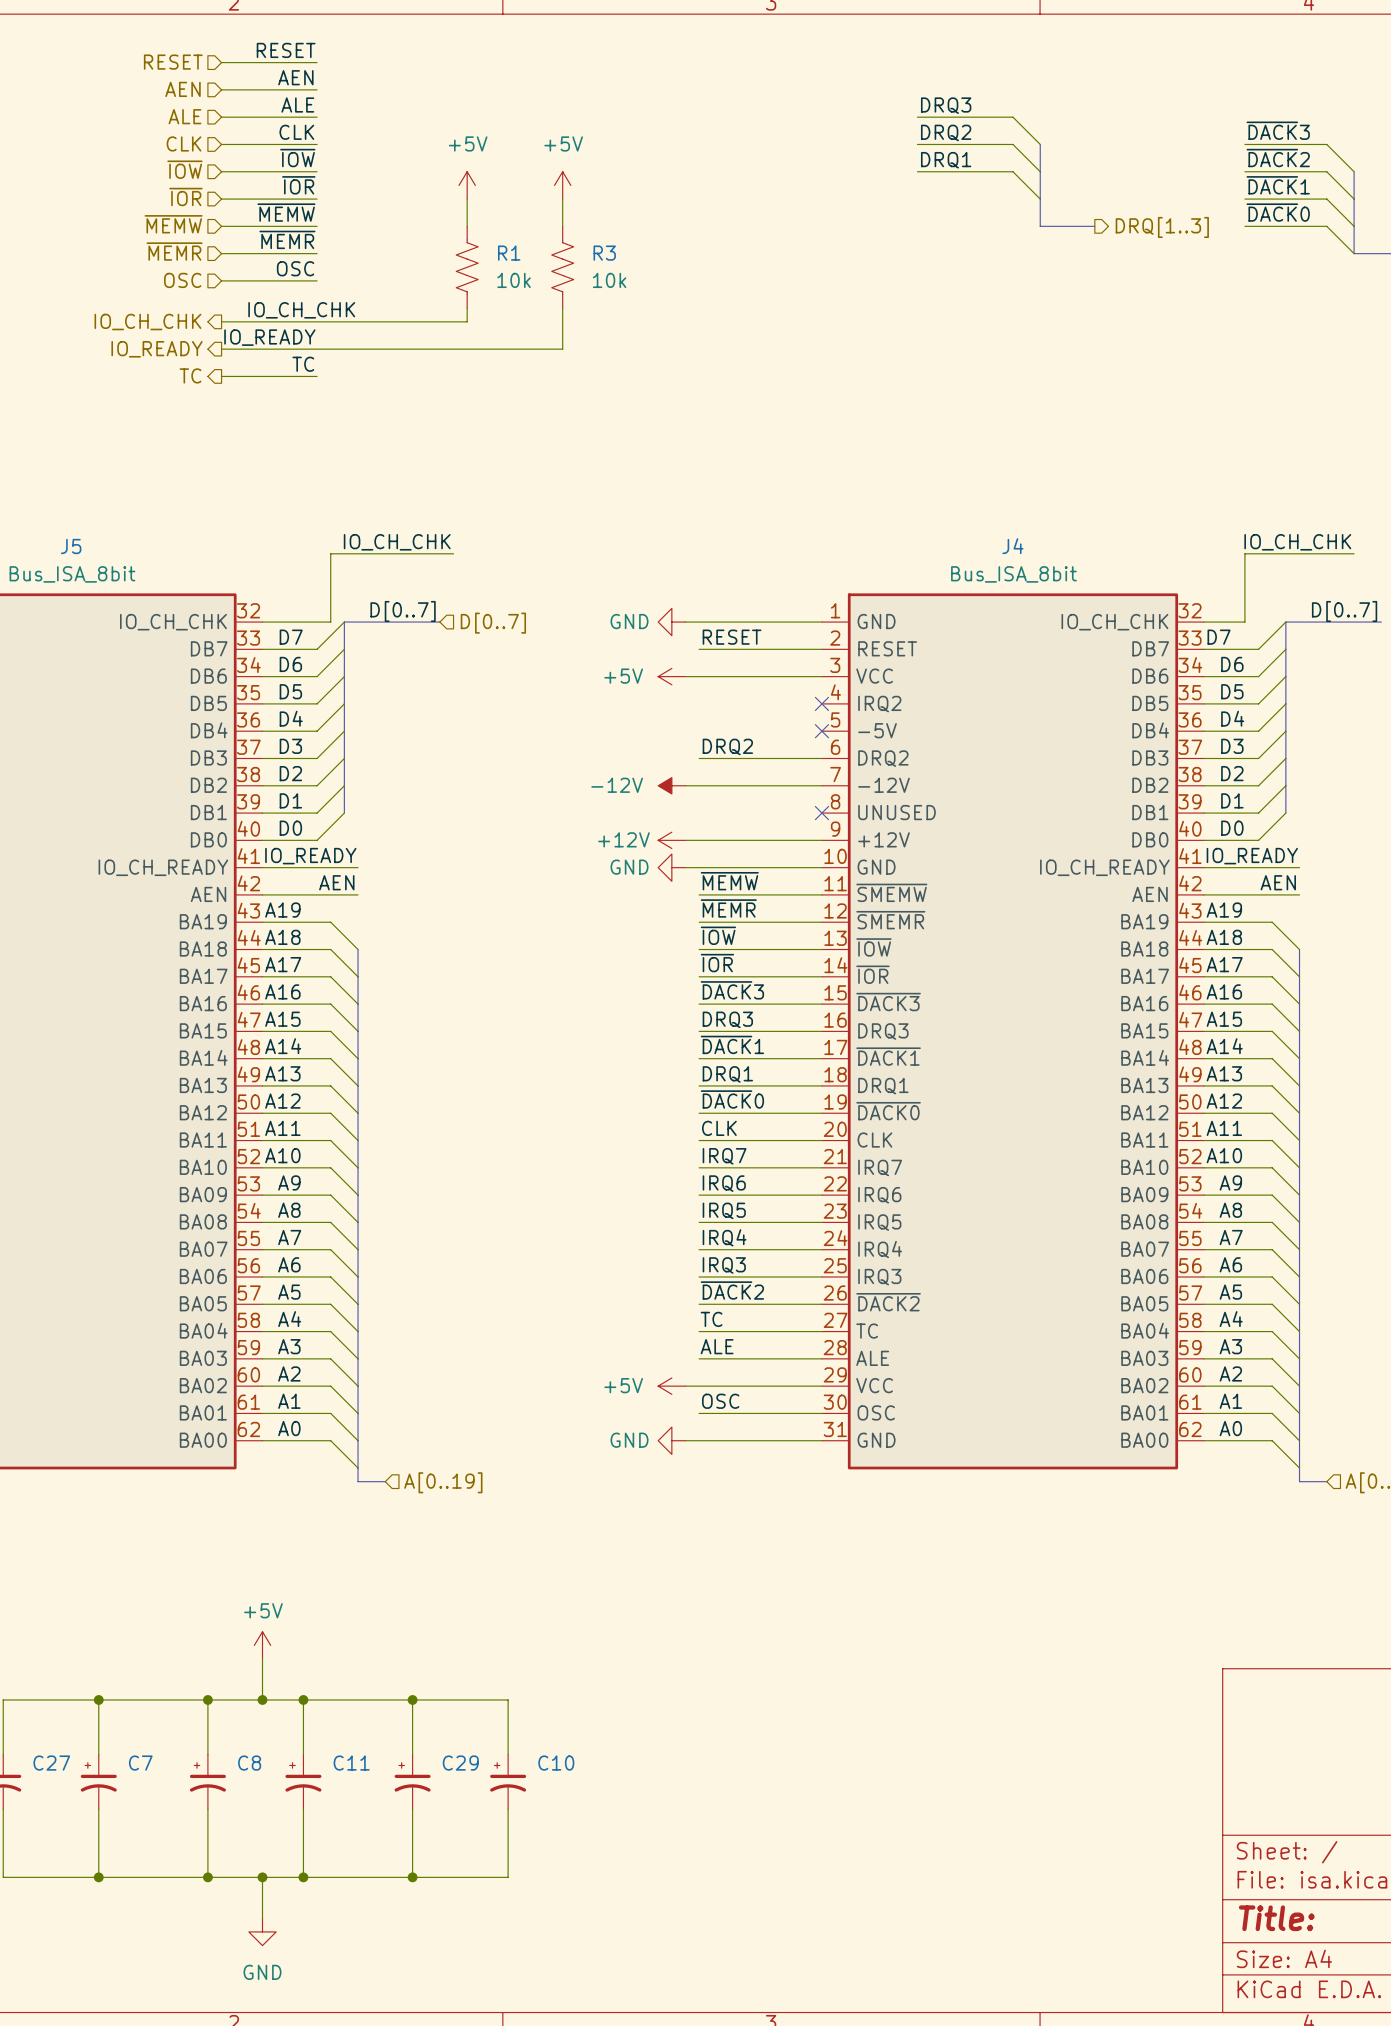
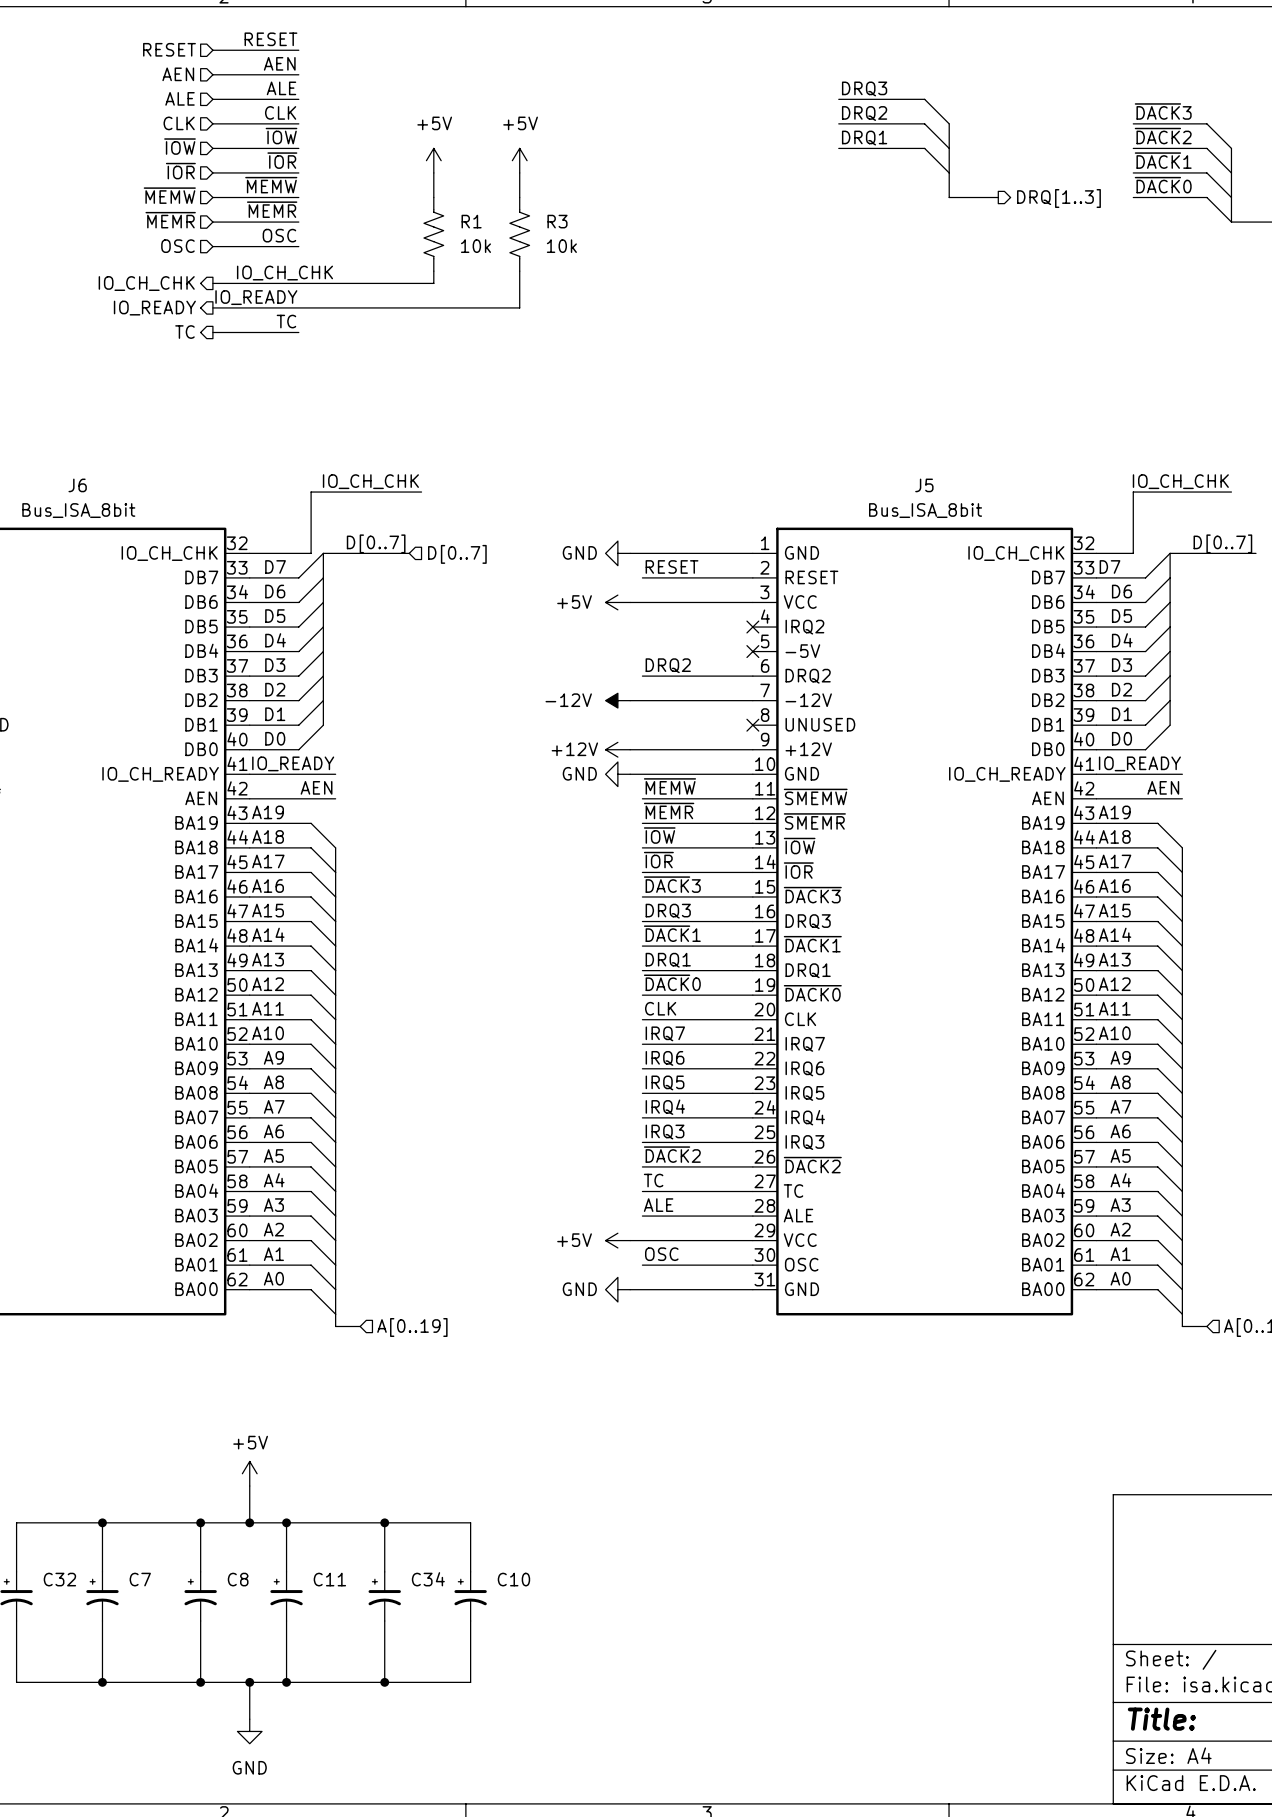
J5 name: J5 (71, 546) -> J6 (77, 485)
J4 name: J4 (1012, 546) -> J5 (924, 485)
C27 name: C27 (51, 1763) -> C32 (59, 1579)
C29 name: C29 (460, 1763) -> C34 (428, 1579)

